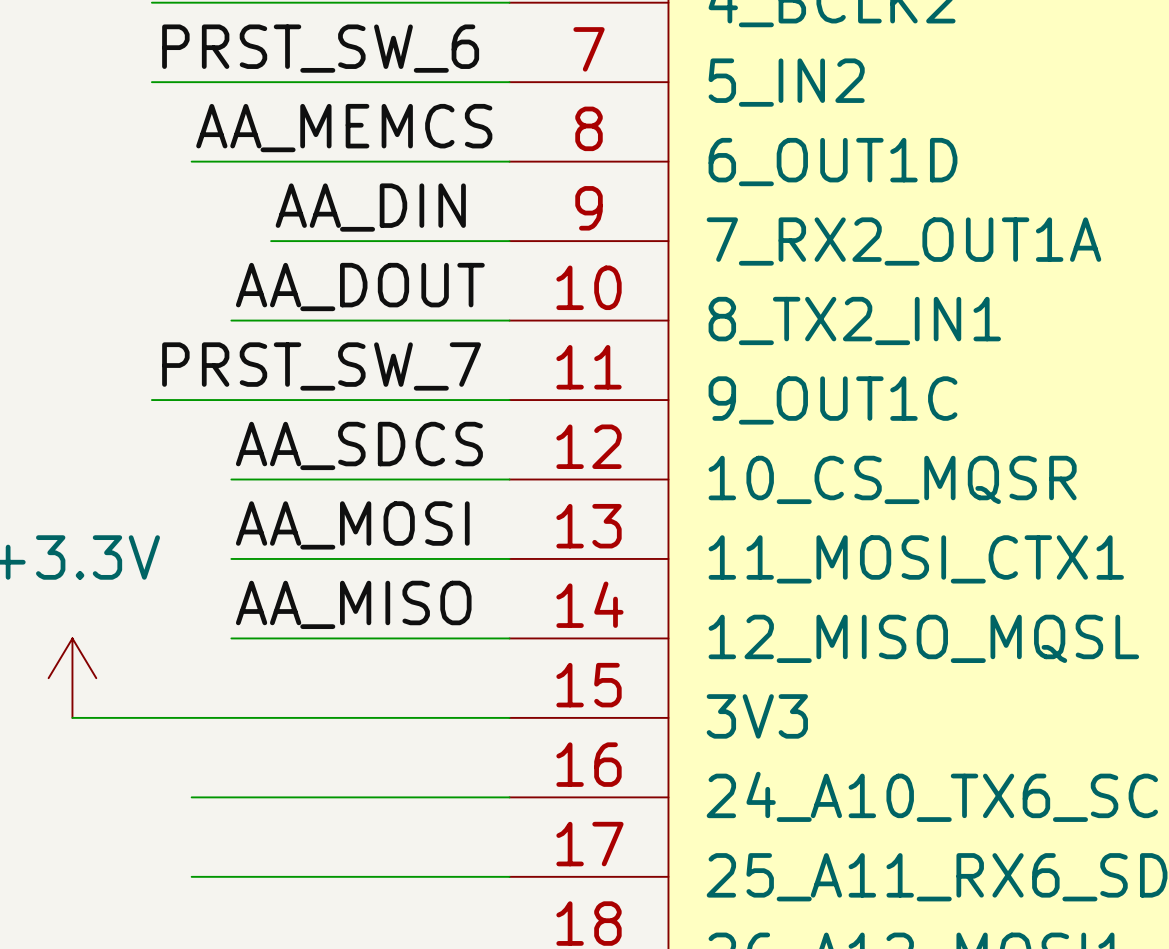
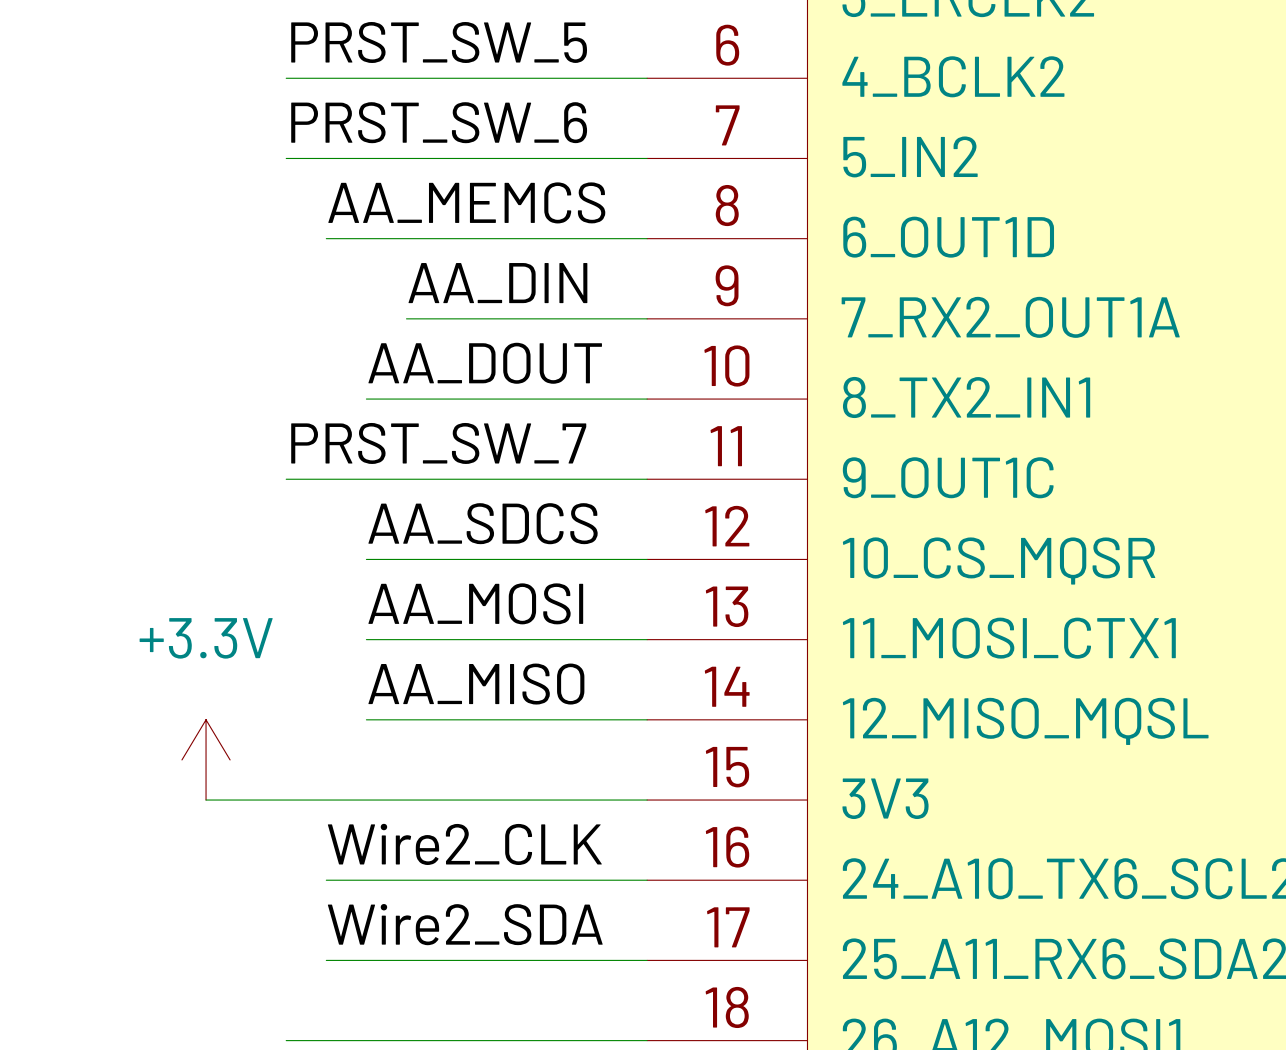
label: none -> Wire2_CLK (464, 844)
label: none -> Wire2_SDA (465, 924)

